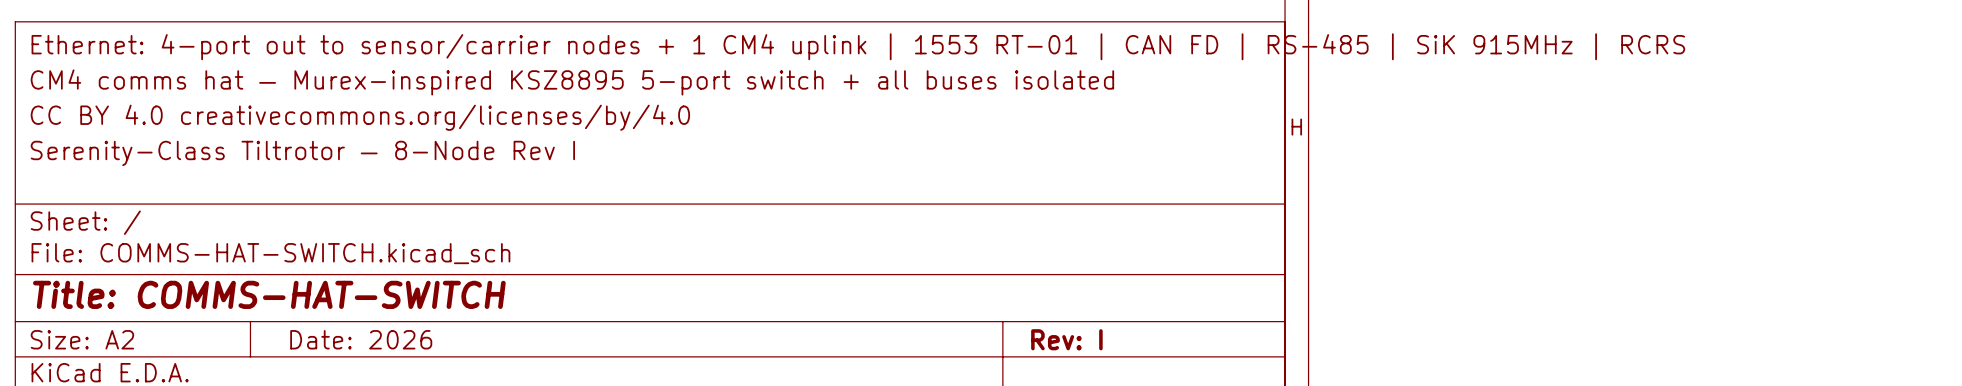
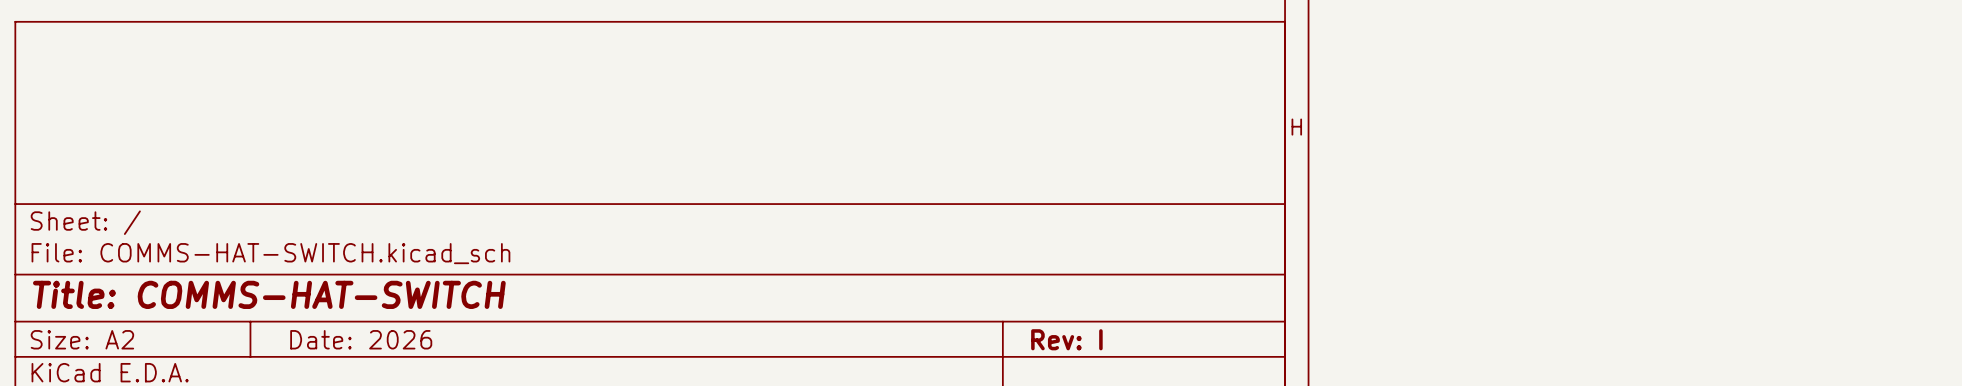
title block: Ethernet: 4-port out to sensor/carrier nodes + 1 CM4 uplink | 1553 RT-01 | CAN FD | RS-485 | SiK 915MHz | RCRS (858, 46) -> none
title block: CM4 comms hat — Murex-inspired KSZ8895 5-port switch + all buses isolated (572, 82) -> none
title block: CC BY 4.0 creativecommons.org/licenses/by/4.0 (360, 117) -> none
title block: Serenity-Class Tiltrotor — 8-Node Rev I (302, 153) -> none

